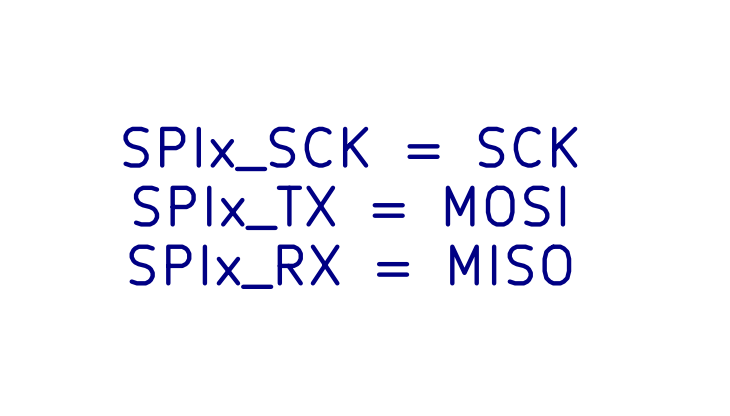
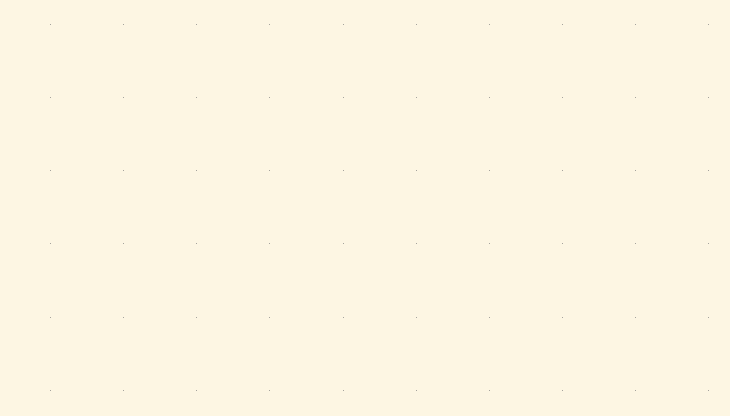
text: SPIx_SCK = SCK (350, 148) -> none
text: SPIx_TX = MOSI (349, 207) -> none
text: SPIx_RX = MISO (350, 266) -> none

